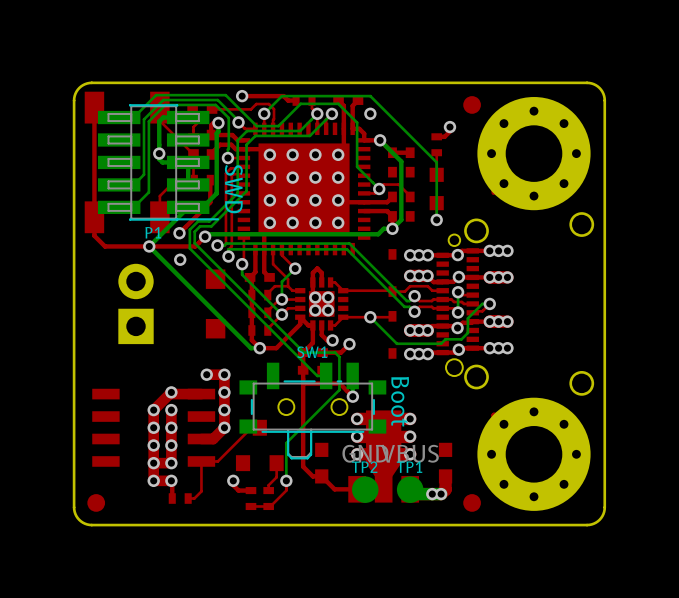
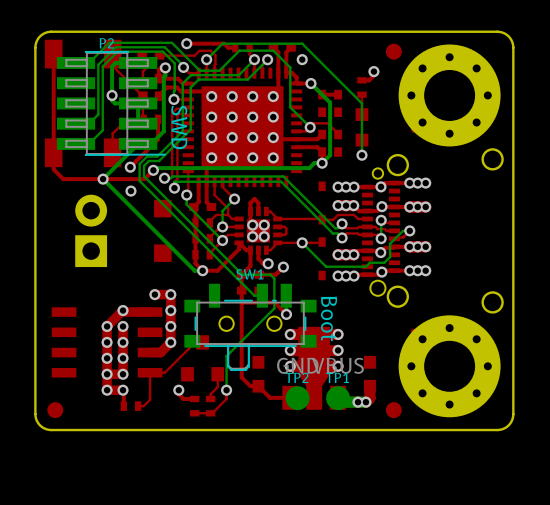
P1 name: P1 (153, 232) -> P2 (106, 43)
top track: none -> (277, 226) (286, 228) (284, 234) (277, 234)

